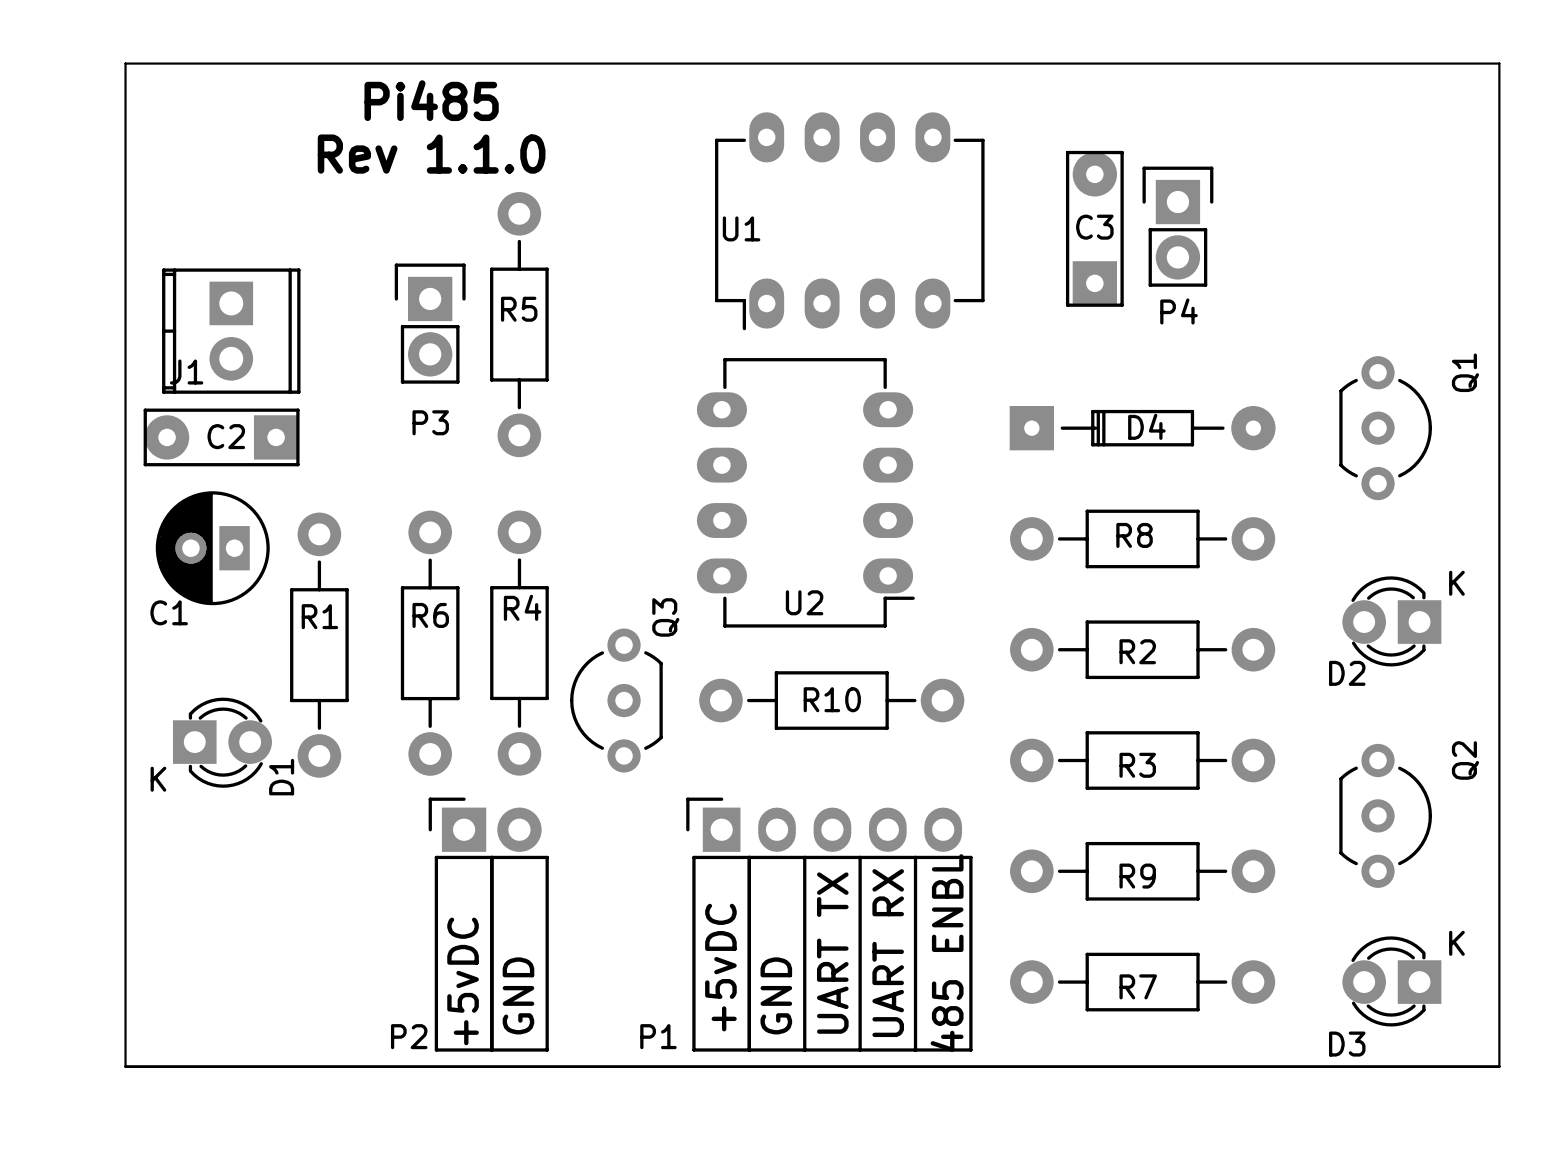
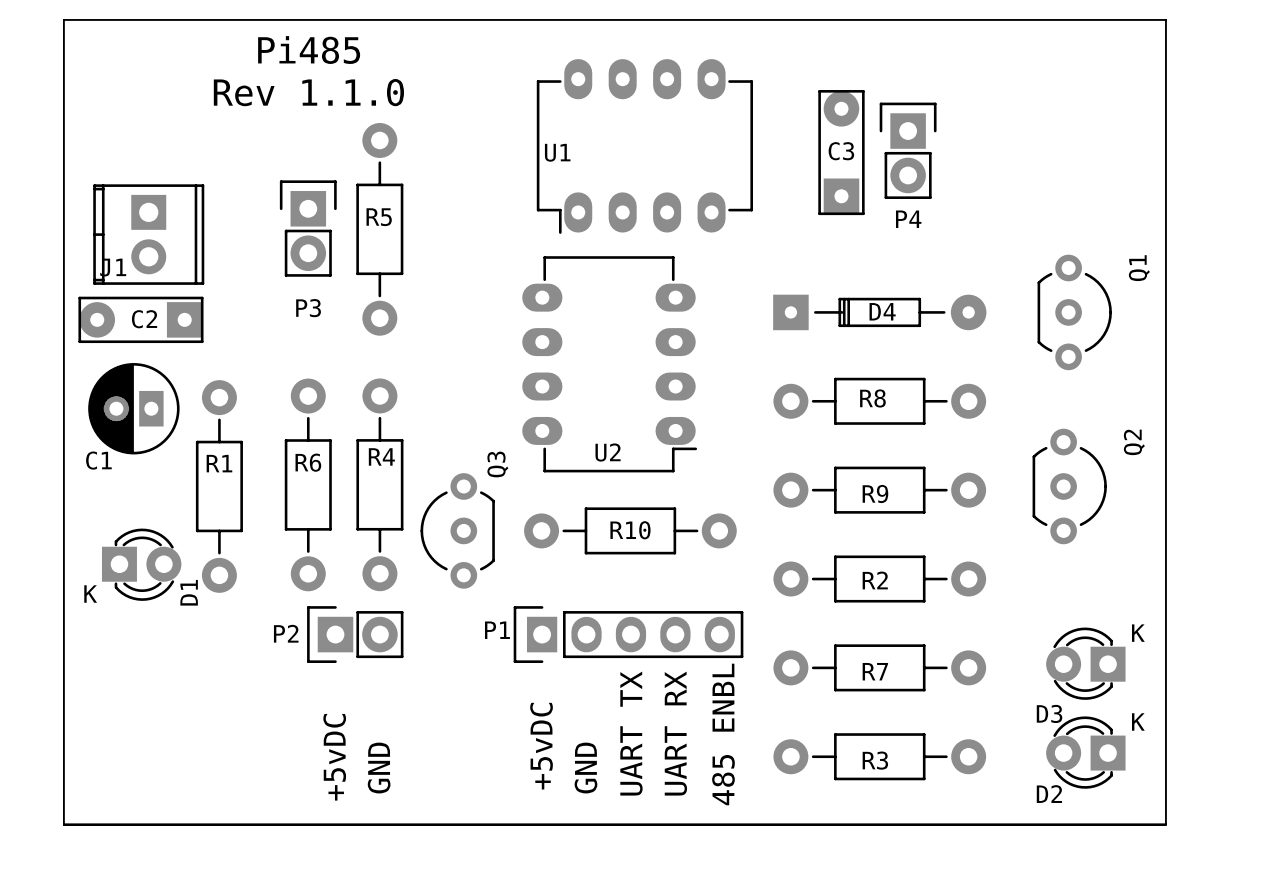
D2 position: (1391, 621) -> (1085, 752)
R2 name: R2 (1137, 651) -> R9 (875, 494)
R3 name: R3 (1137, 765) -> R2 (875, 580)
P2 footprint: [428, 797, 549, 1052] -> [307, 606, 404, 663]
P1 footprint: [686, 797, 973, 1052] -> [513, 606, 744, 663]
Q2 position: (1385, 815) -> (1069, 486)
R9 name: R9 (1137, 876) -> R7 (875, 671)
D3 position: (1391, 981) -> (1085, 663)
R7 name: R7 (1138, 986) -> R3 (875, 760)
P2 name position: P2 (409, 1036) -> P2 (286, 633)
P1 name position: P1 (658, 1036) -> P1 (497, 630)

